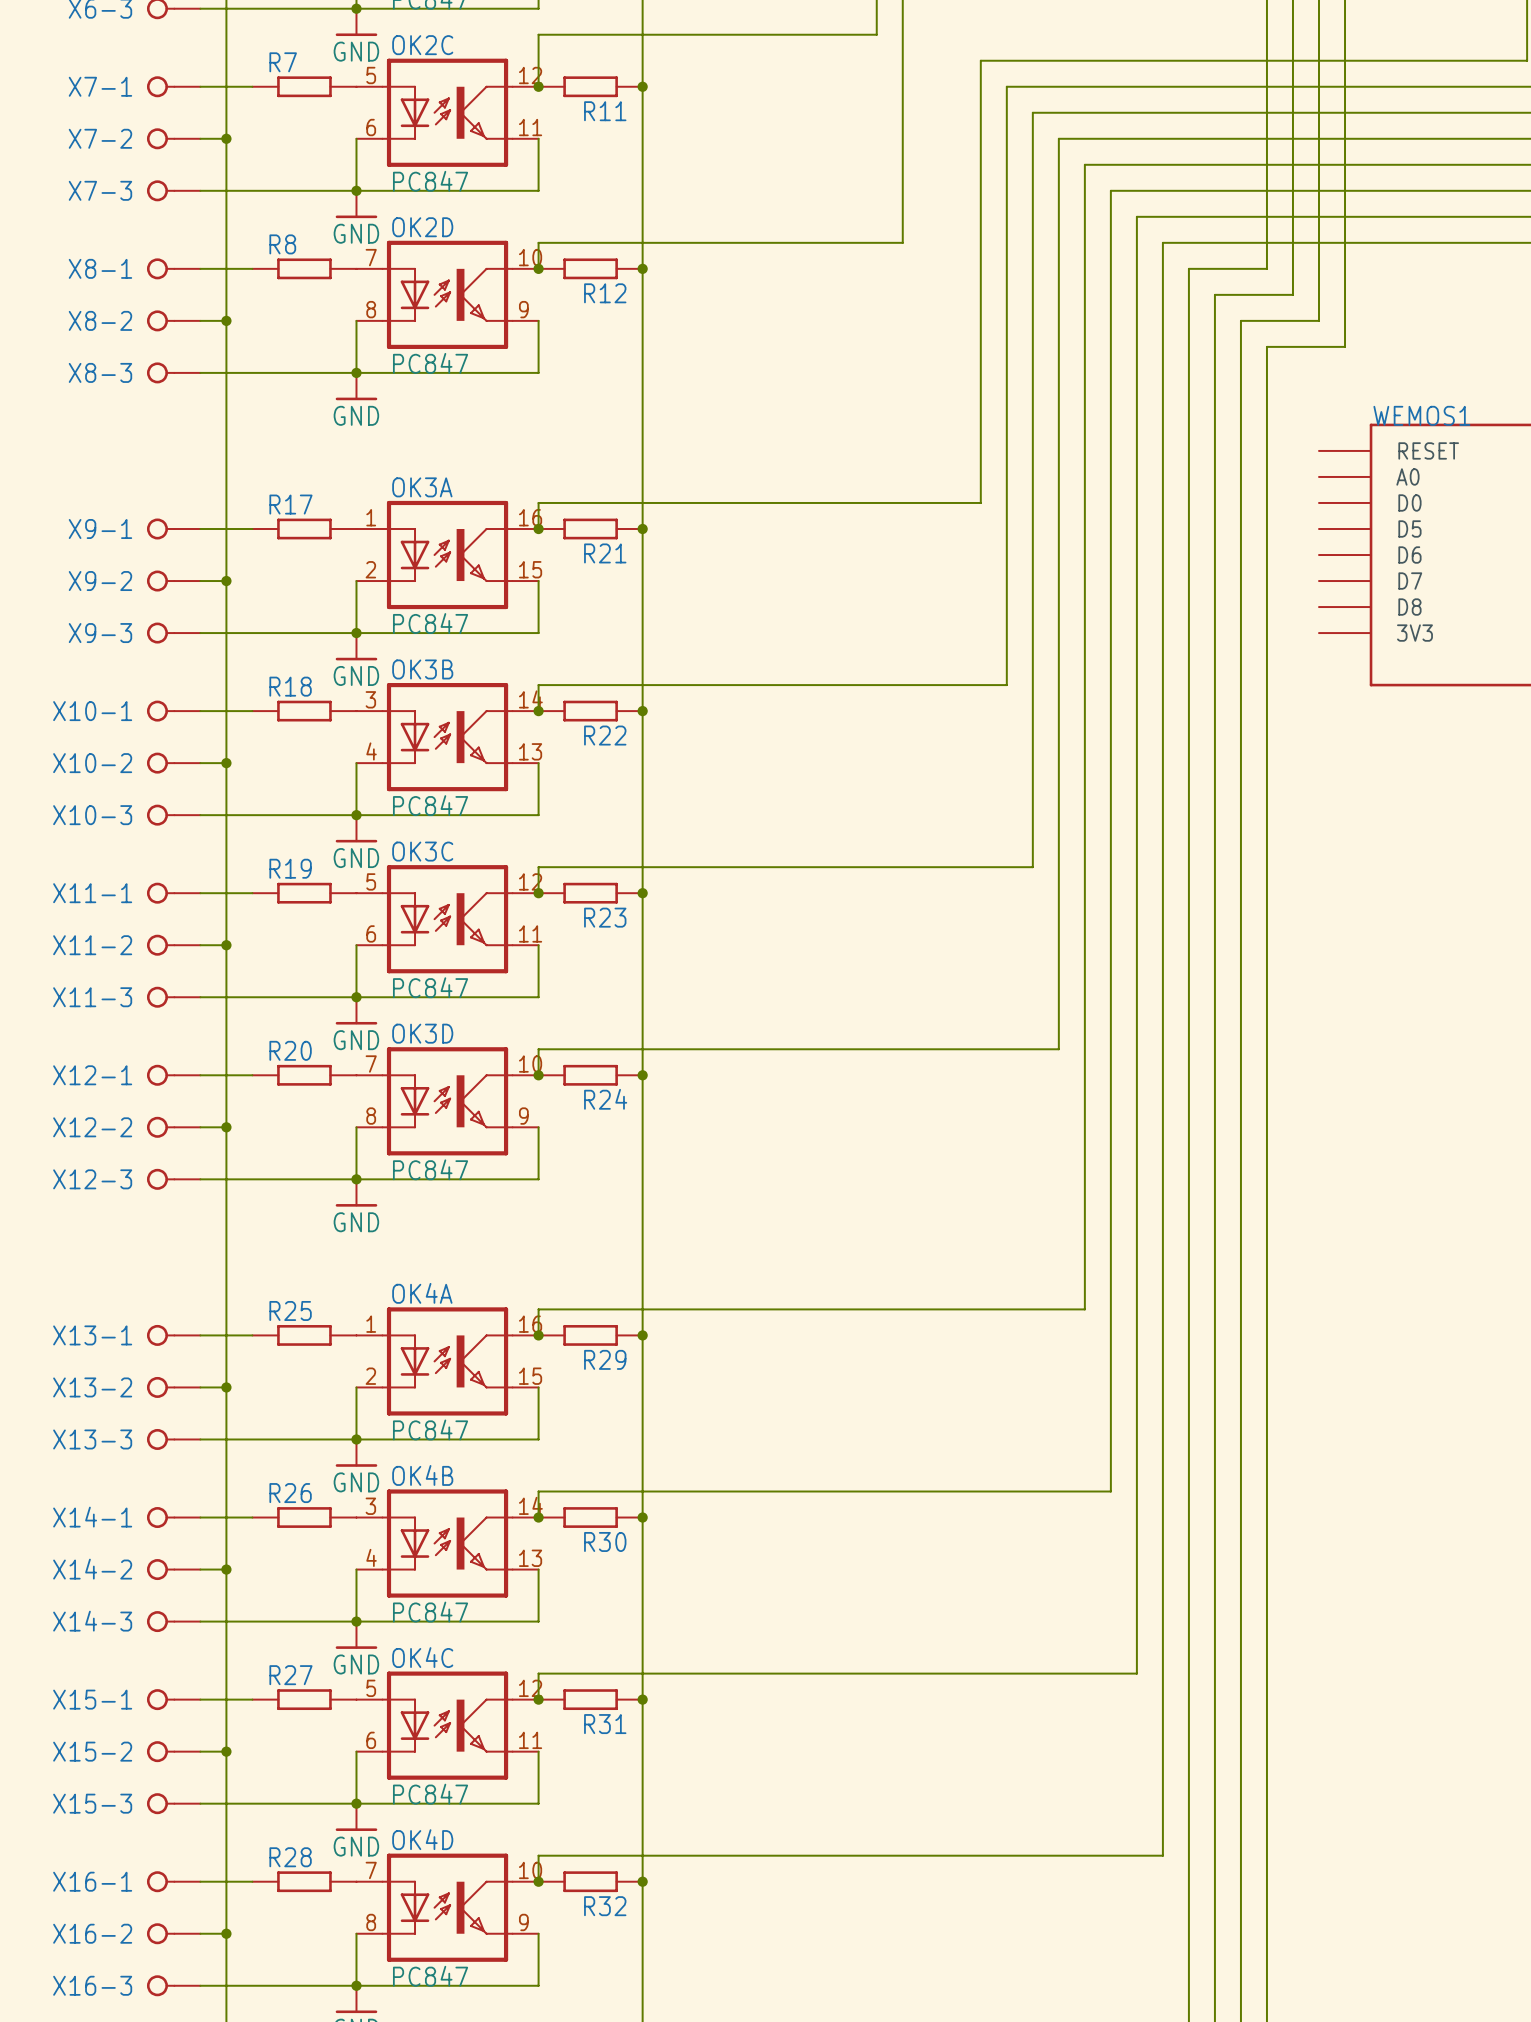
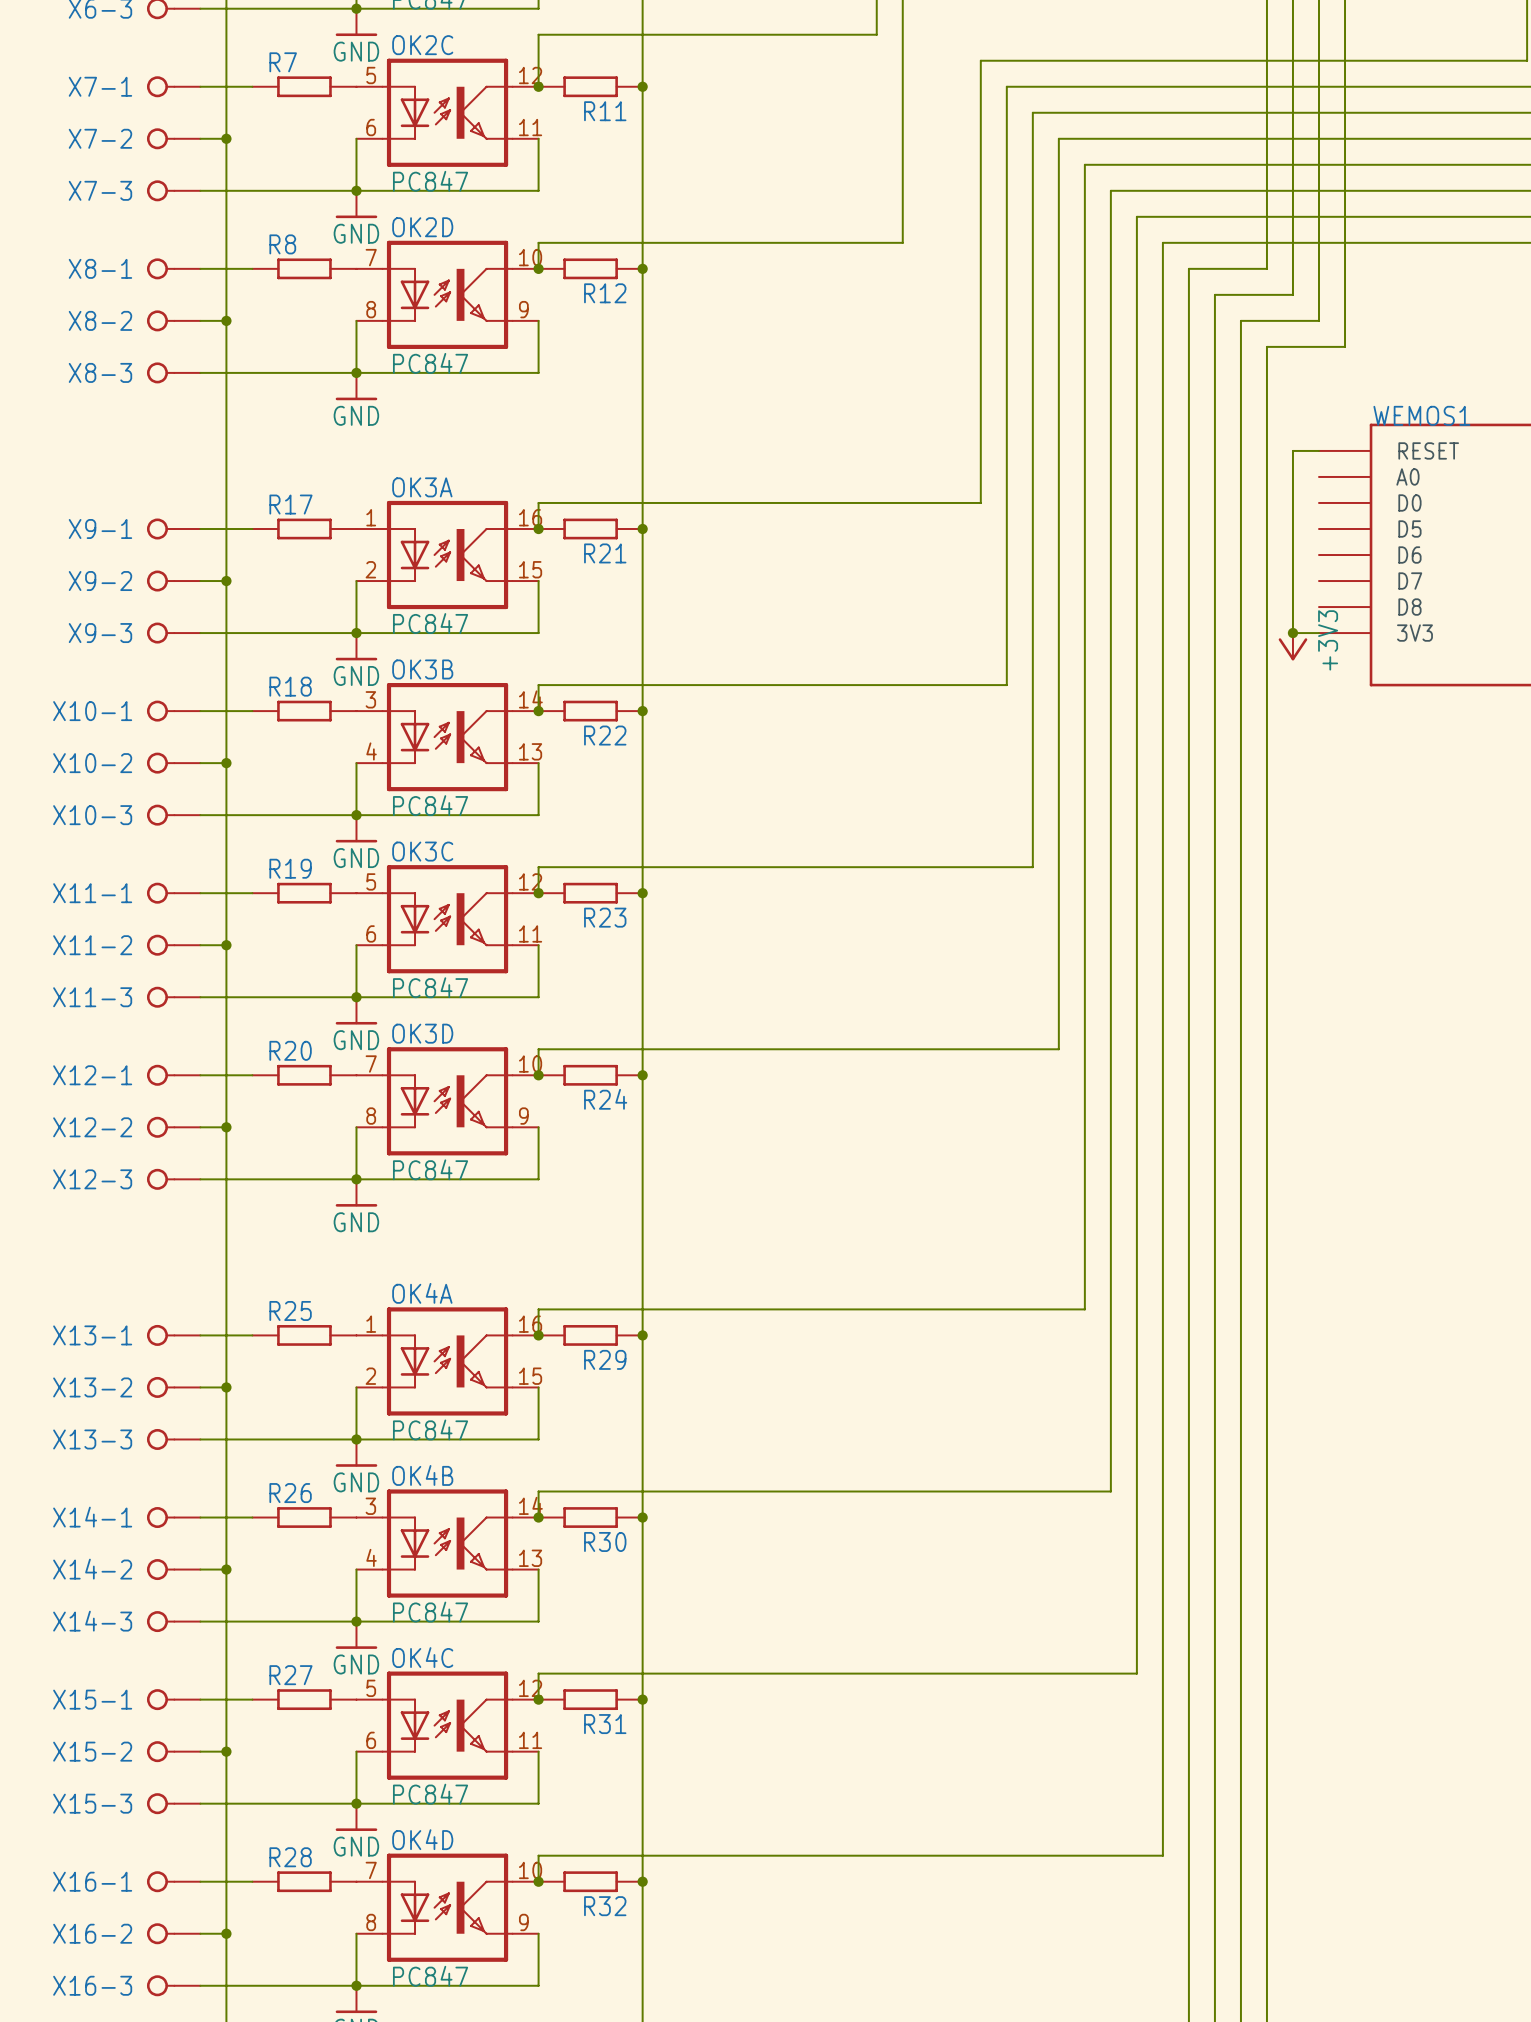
wire: none -> (1318, 450) (1292, 450) (1292, 633) (1318, 633)
junction: none -> (1292, 633)
power symbol: none -> +3V3 (1292, 646)

